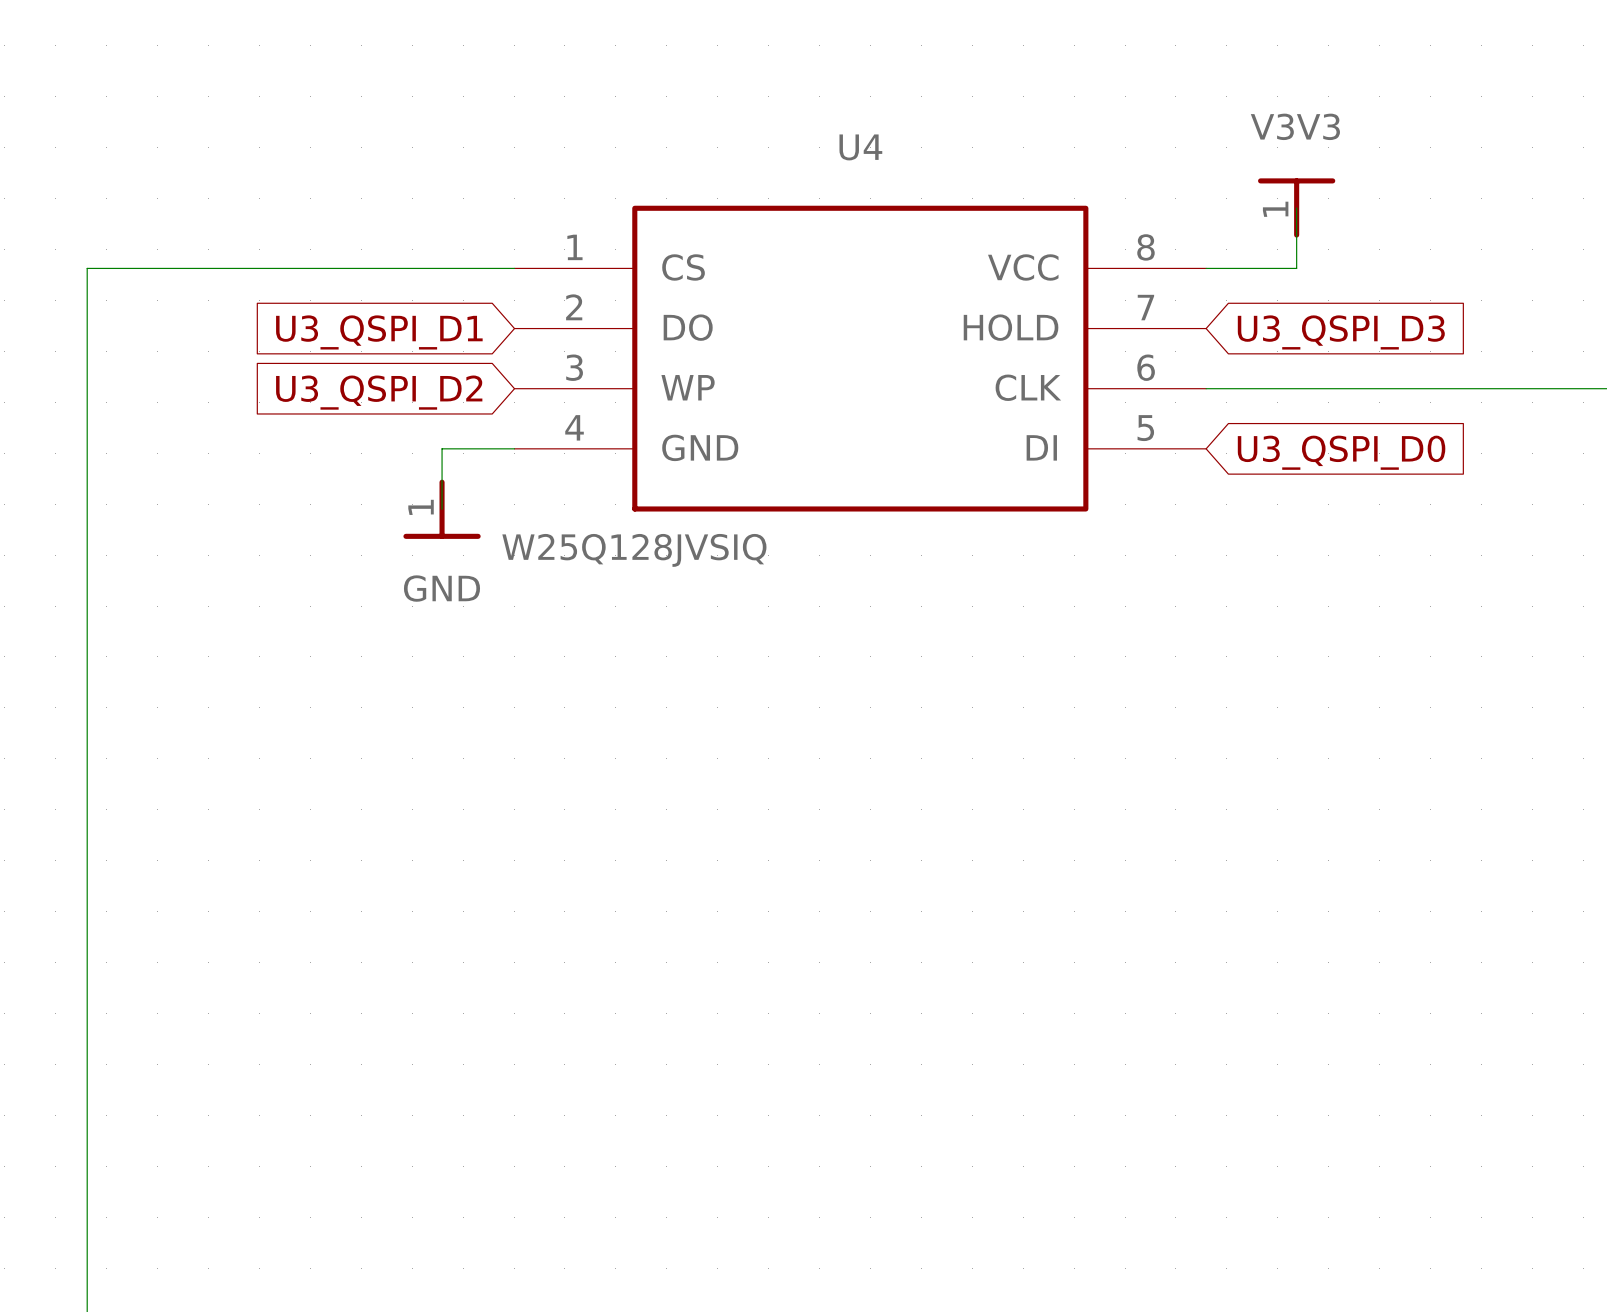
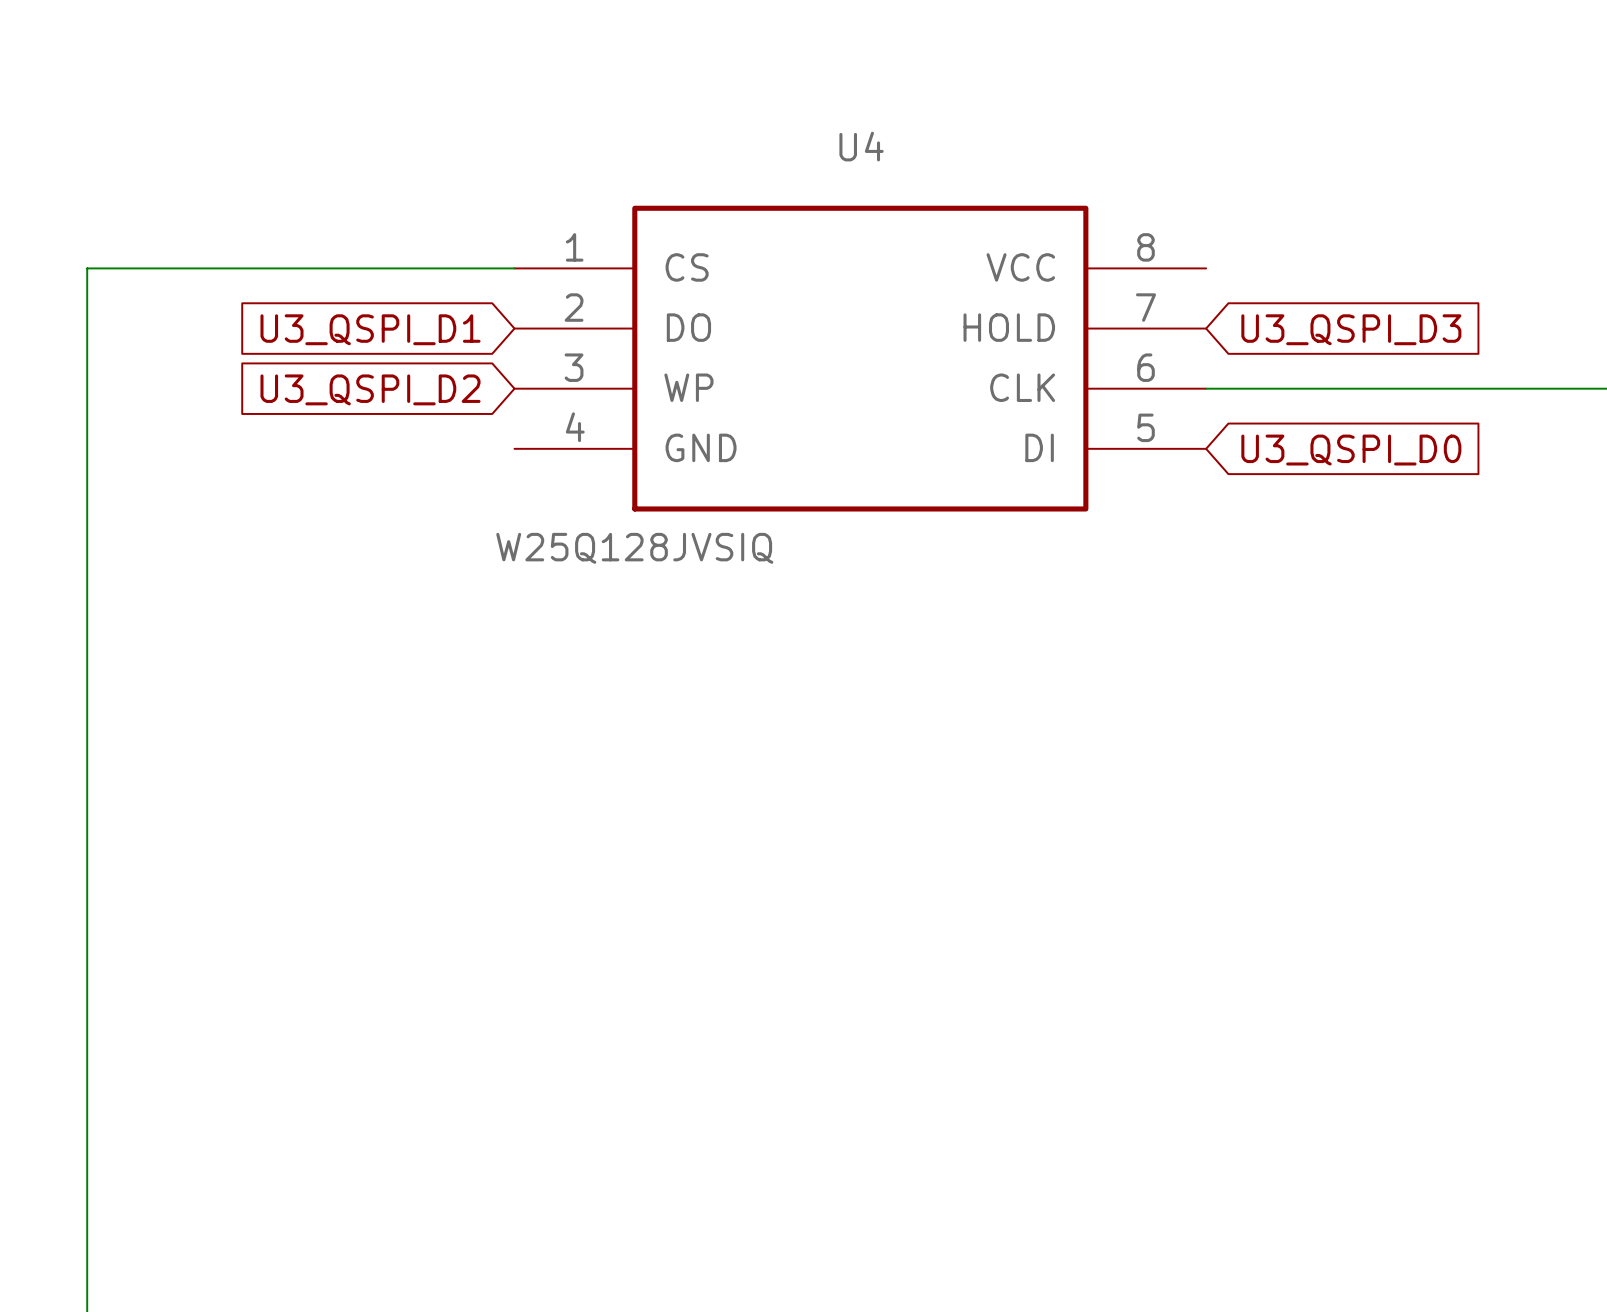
wire: (1296, 207) (1296, 268) (1206, 268) -> none
V3V3: (1296, 207) -> none
wire: (514, 448) (442, 448) (442, 509) -> none
GND: (442, 509) -> none

